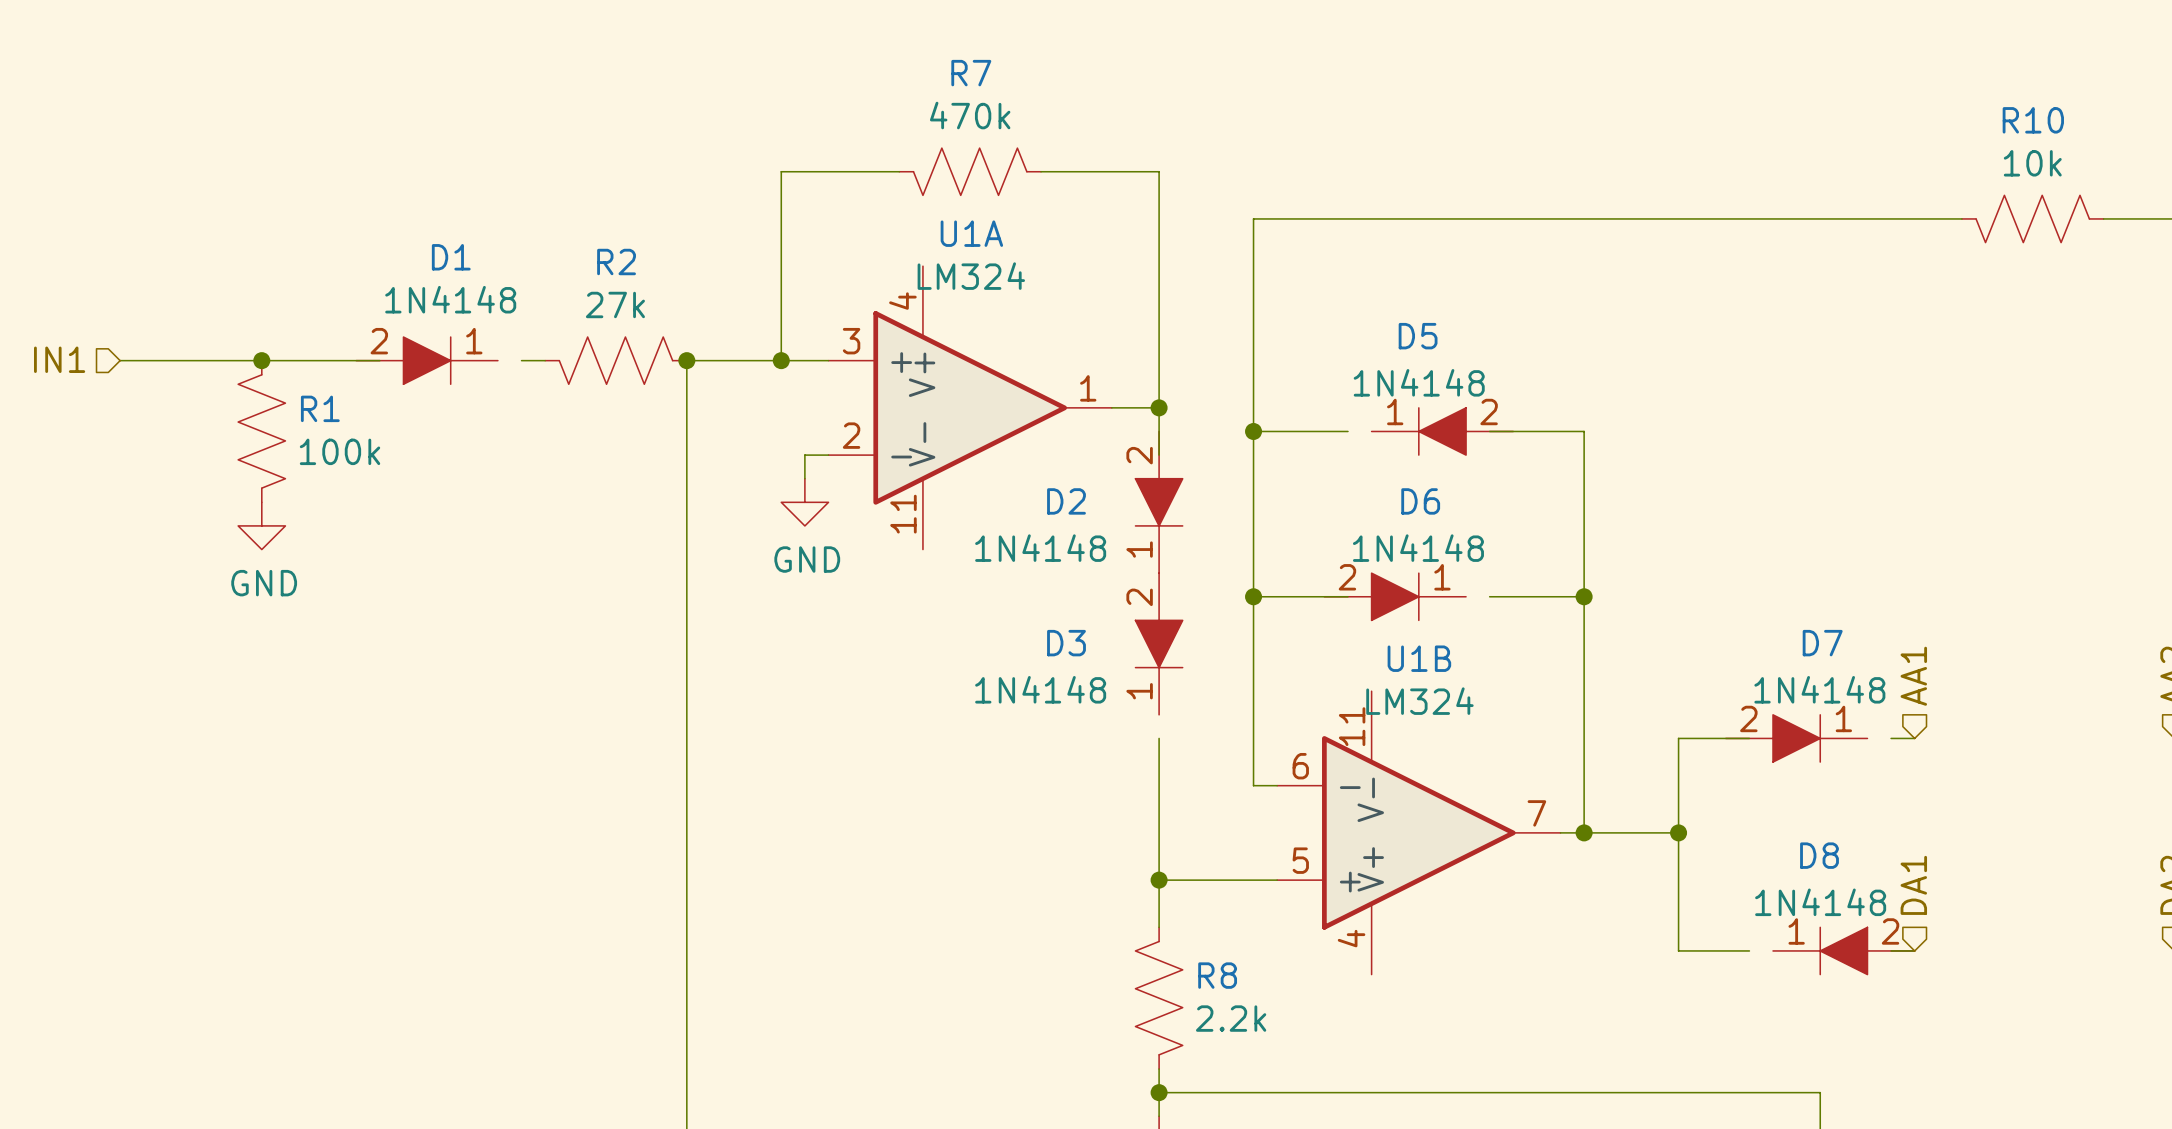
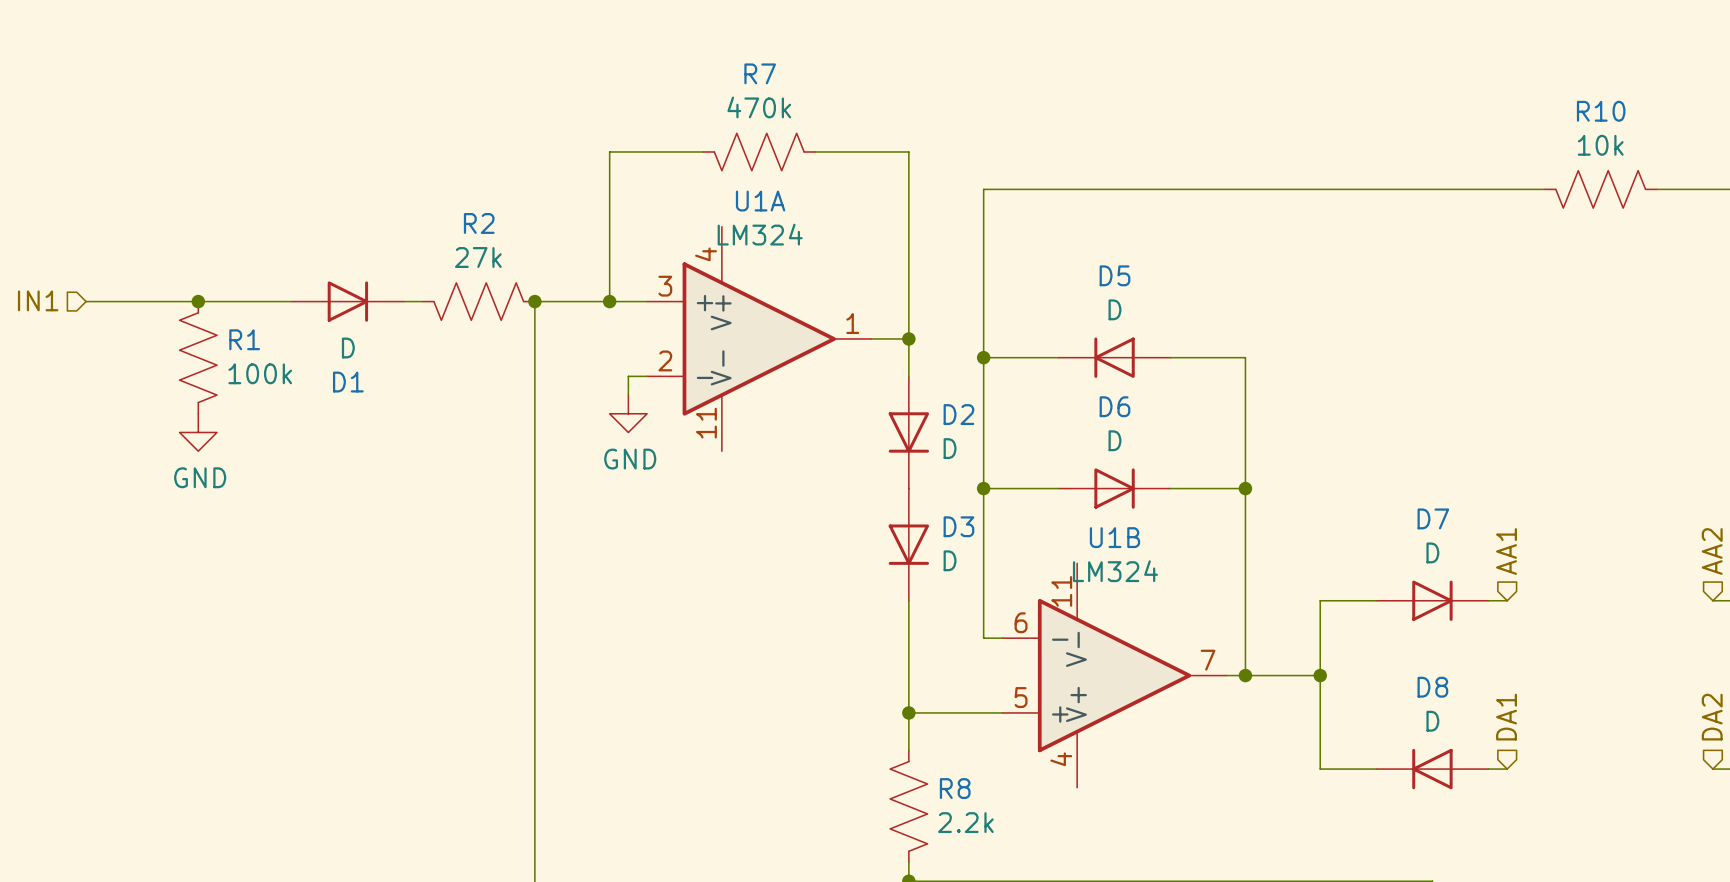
D1 name position: D1 (451, 257) -> D1 (348, 382)
D1 value: 1N4148 (450, 299) -> D (348, 348)
D1 symbol: [356, 337, 498, 385] -> [291, 281, 404, 322]
D5 value: 1N4148 (1419, 382) -> D (1114, 309)
D5 symbol: [1371, 407, 1514, 456] -> [1058, 337, 1171, 378]
D2 symbol: [1135, 431, 1183, 574] -> [888, 376, 930, 489]
D2 name position: D2 (1066, 501) -> D2 (958, 414)
D2 value: 1N4148 (1040, 548) -> D (950, 448)
D6 value: 1N4148 (1418, 548) -> D (1114, 440)
D3 symbol: [1135, 573, 1183, 715] -> [888, 488, 930, 601]
D6 symbol: [1324, 573, 1467, 621] -> [1058, 468, 1171, 509]
D3 name position: D3 (1066, 643) -> D3 (958, 526)
D3 value: 1N4148 (1040, 689) -> D (950, 560)
D7 value: 1N4148 (1819, 689) -> D (1432, 552)
D7 symbol: [1725, 714, 1868, 763] -> [1376, 580, 1489, 621]
D8 value: 1N4148 (1820, 902) -> D (1432, 721)
D8 symbol: [1773, 927, 1915, 975] -> [1376, 748, 1489, 790]

